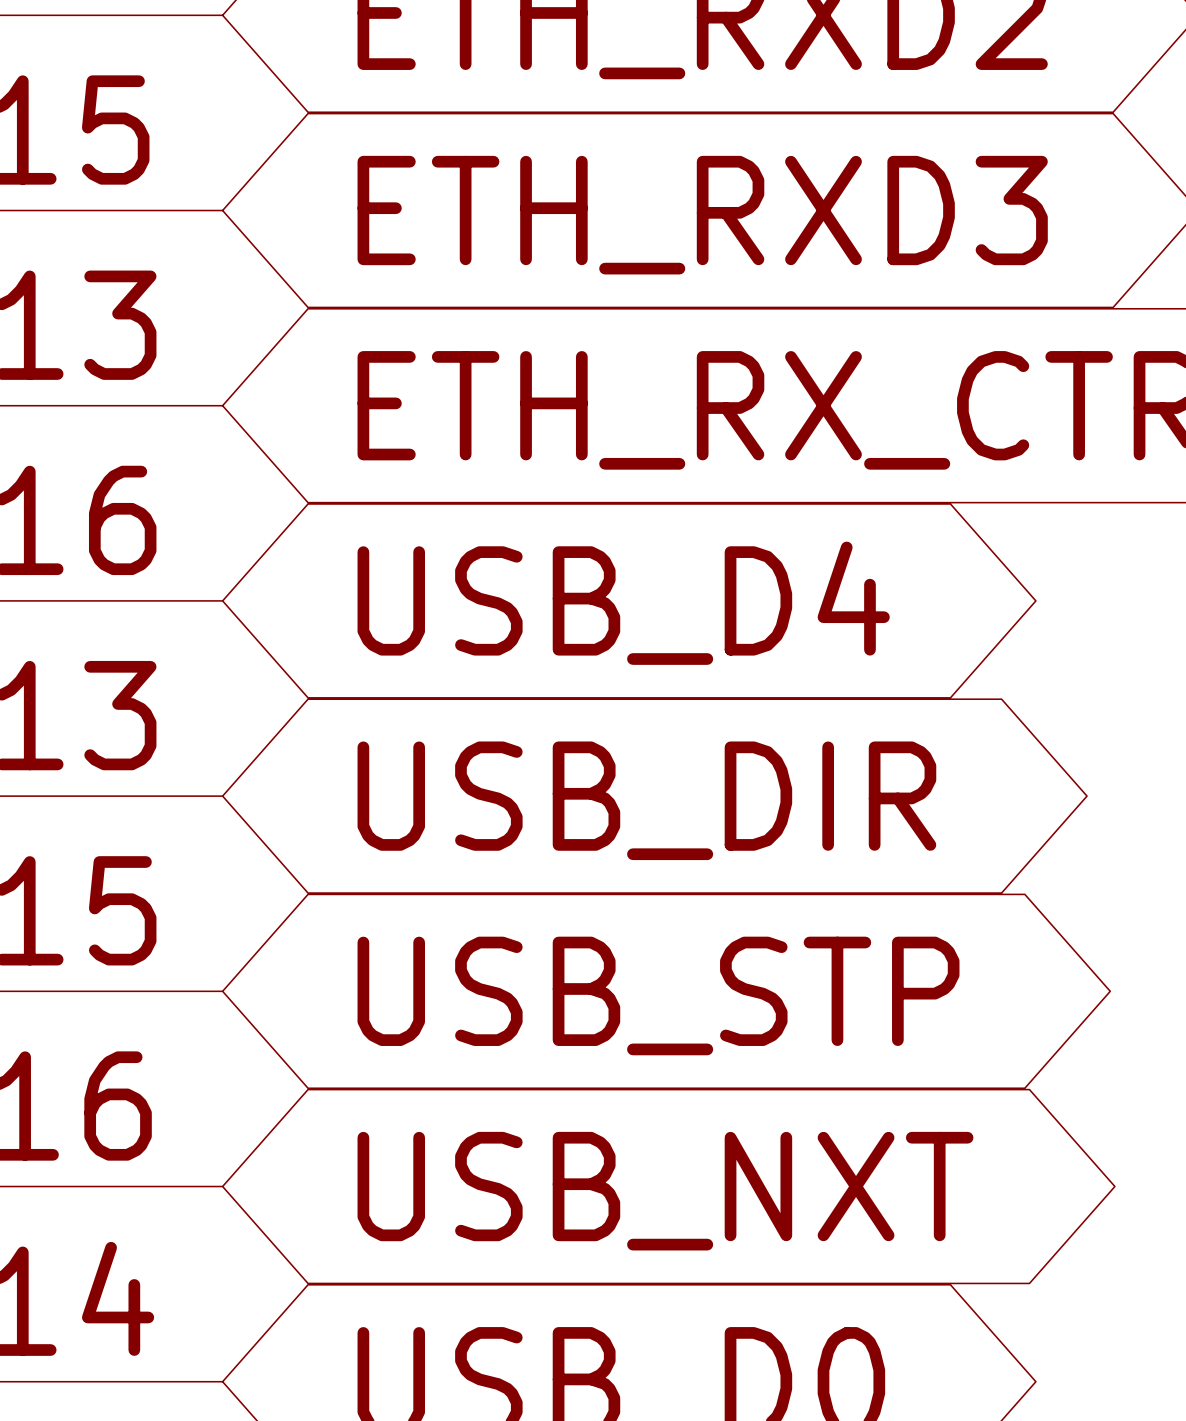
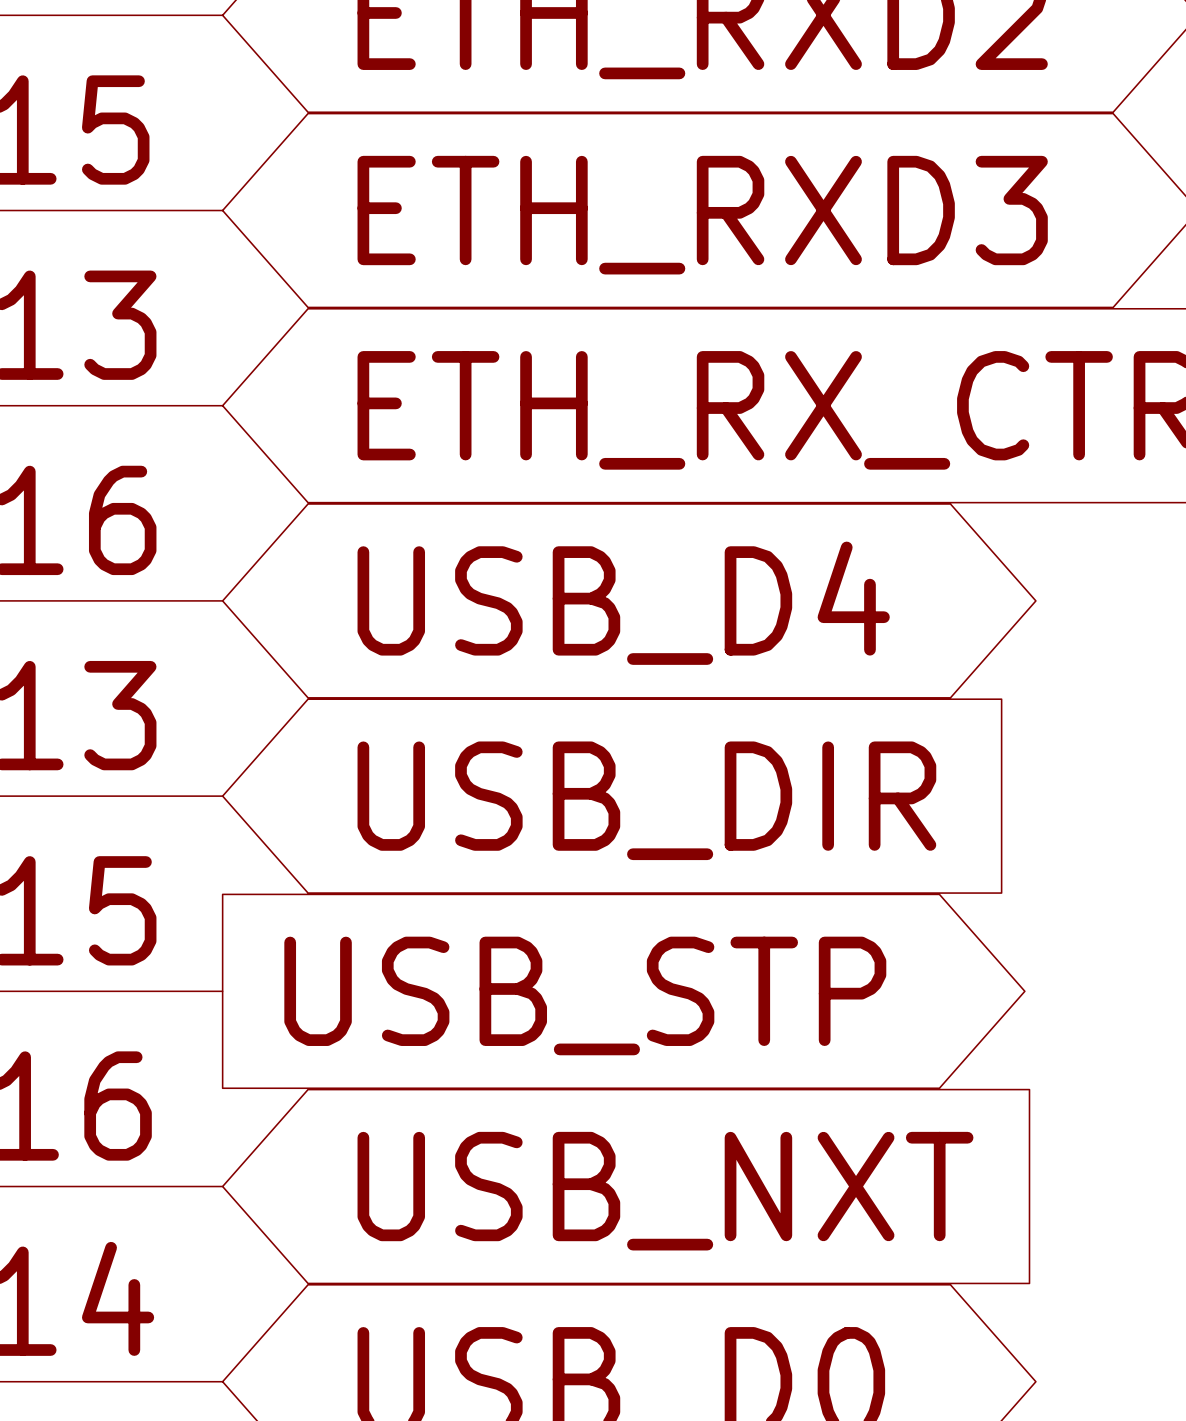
global label shape: bidirectional (646, 800) -> input (646, 800)
global label shape: bidirectional (658, 995) -> output (585, 995)
global label shape: bidirectional (665, 1191) -> input (665, 1191)

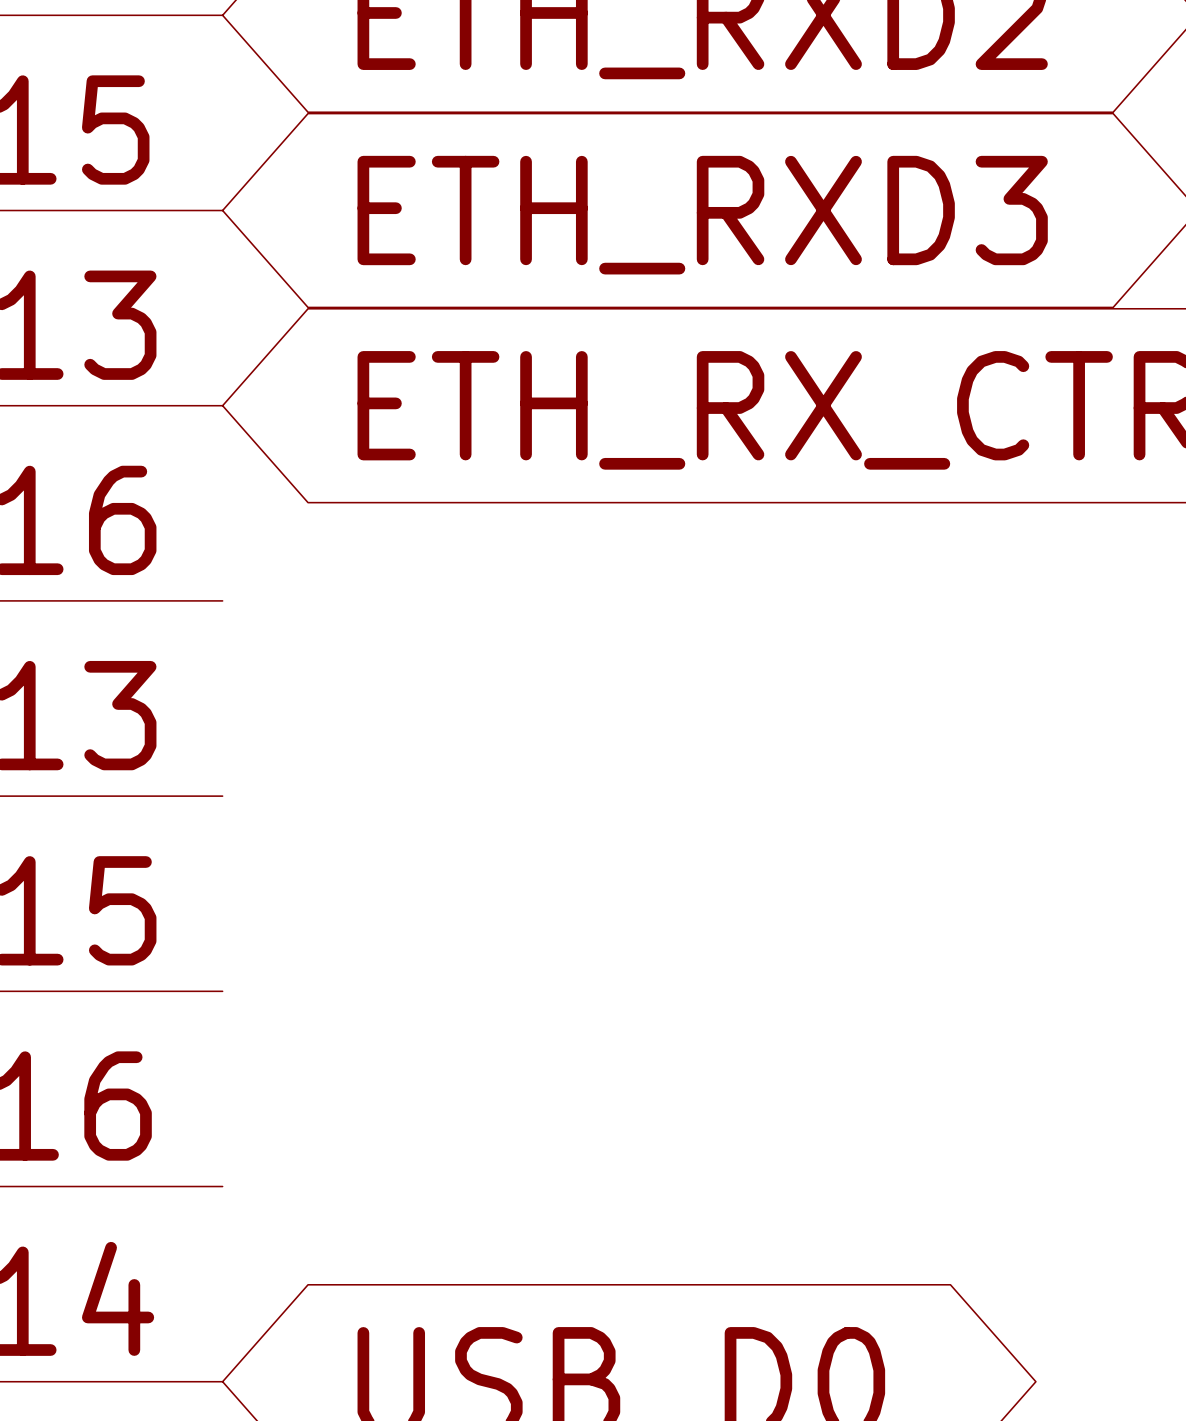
global label: USB_D4 (623, 603) -> none
global label: USB_DIR (646, 800) -> none
global label: USB_STP (585, 995) -> none
global label: USB_NXT (665, 1191) -> none

